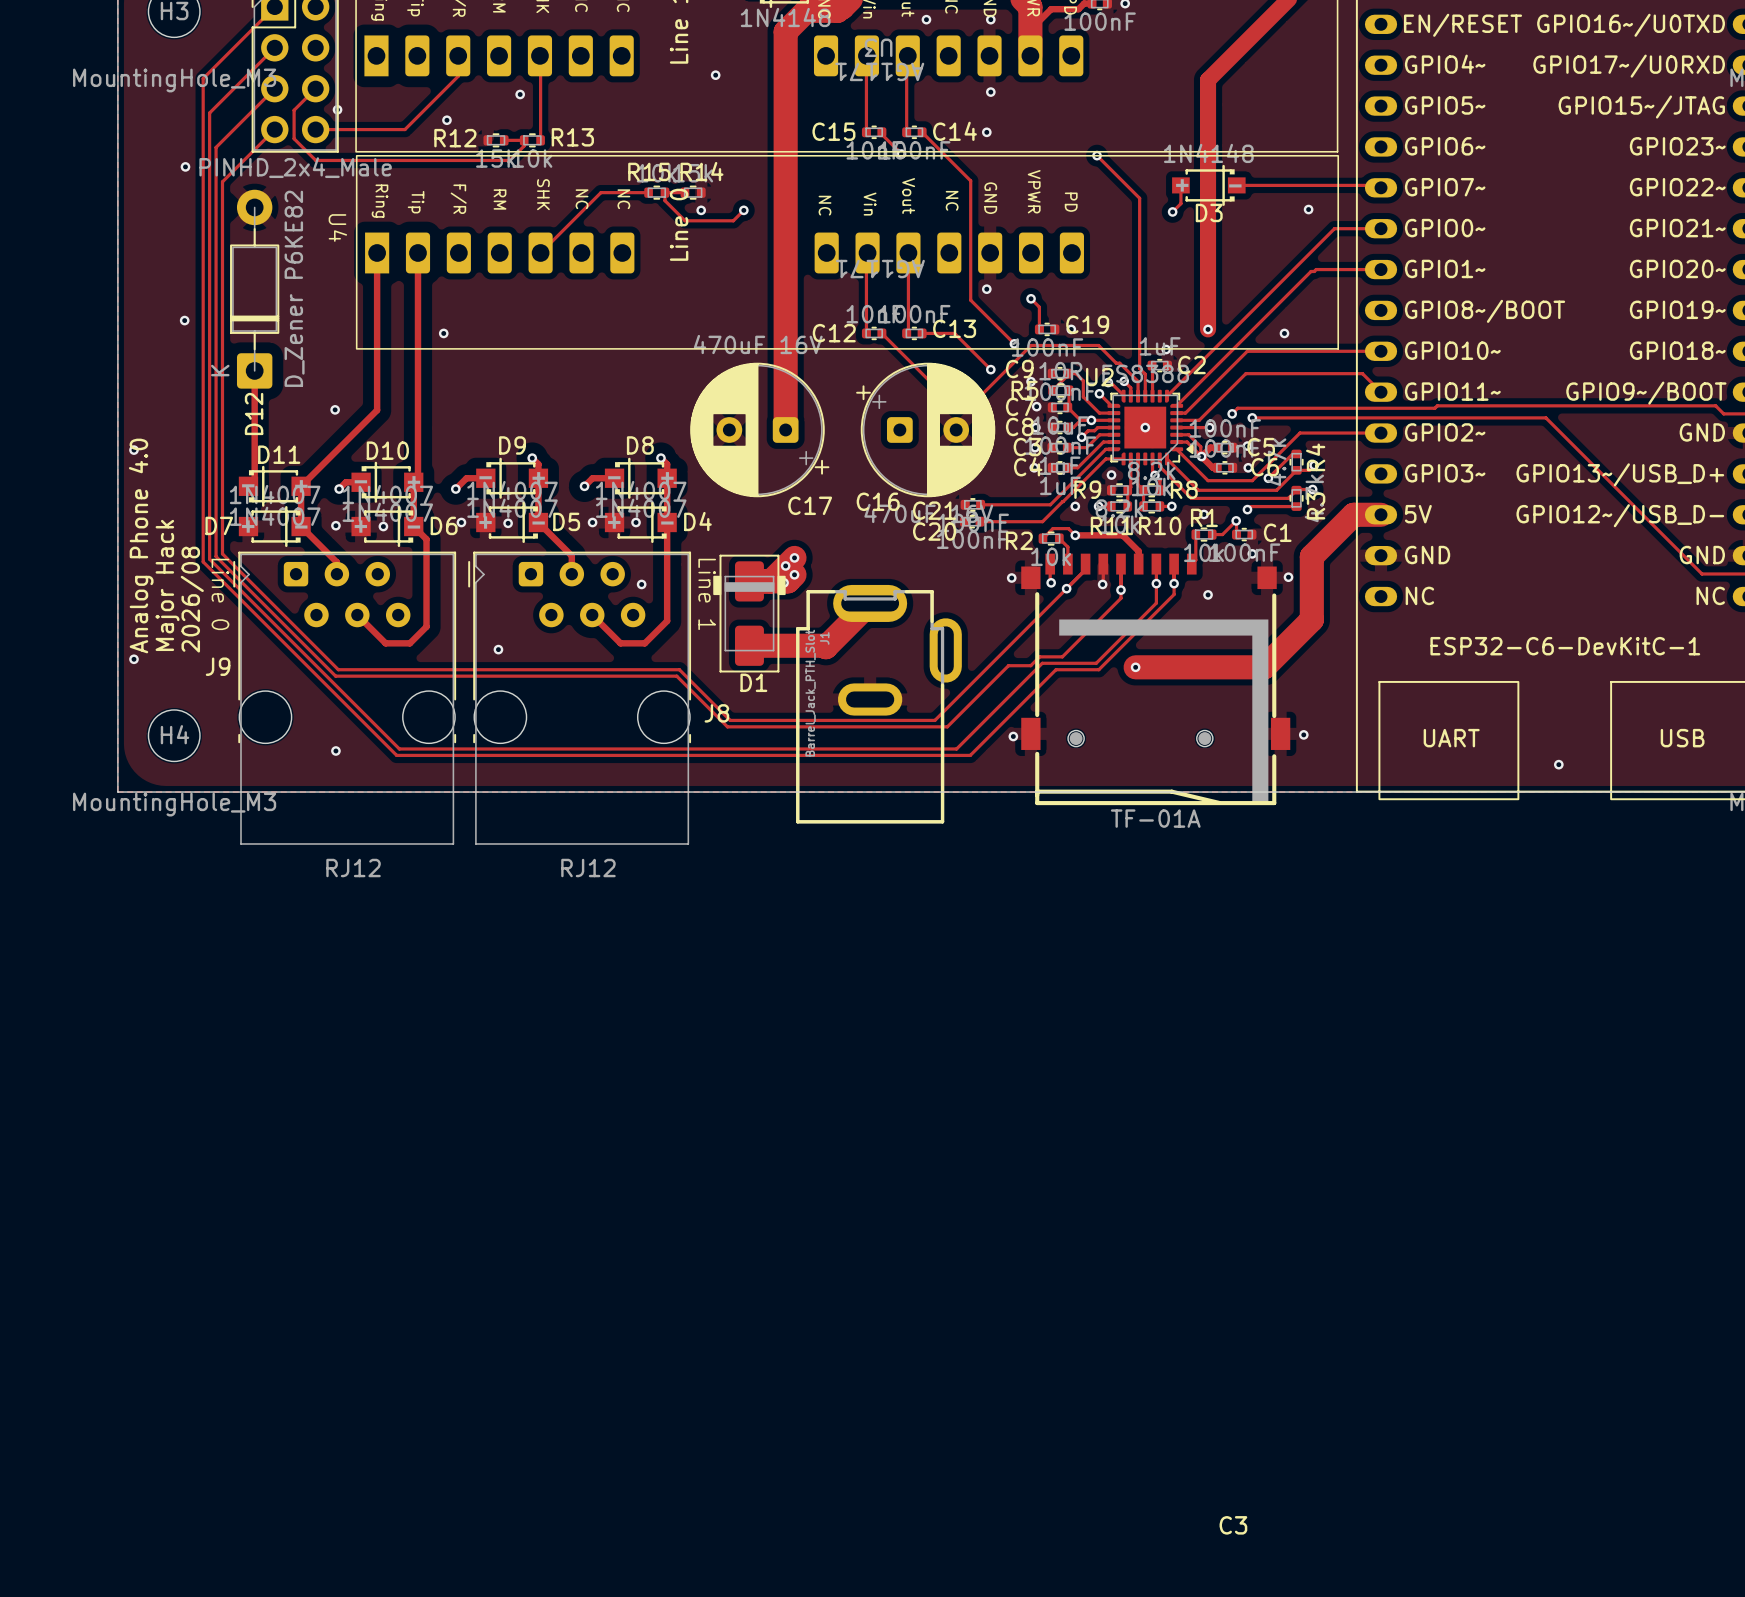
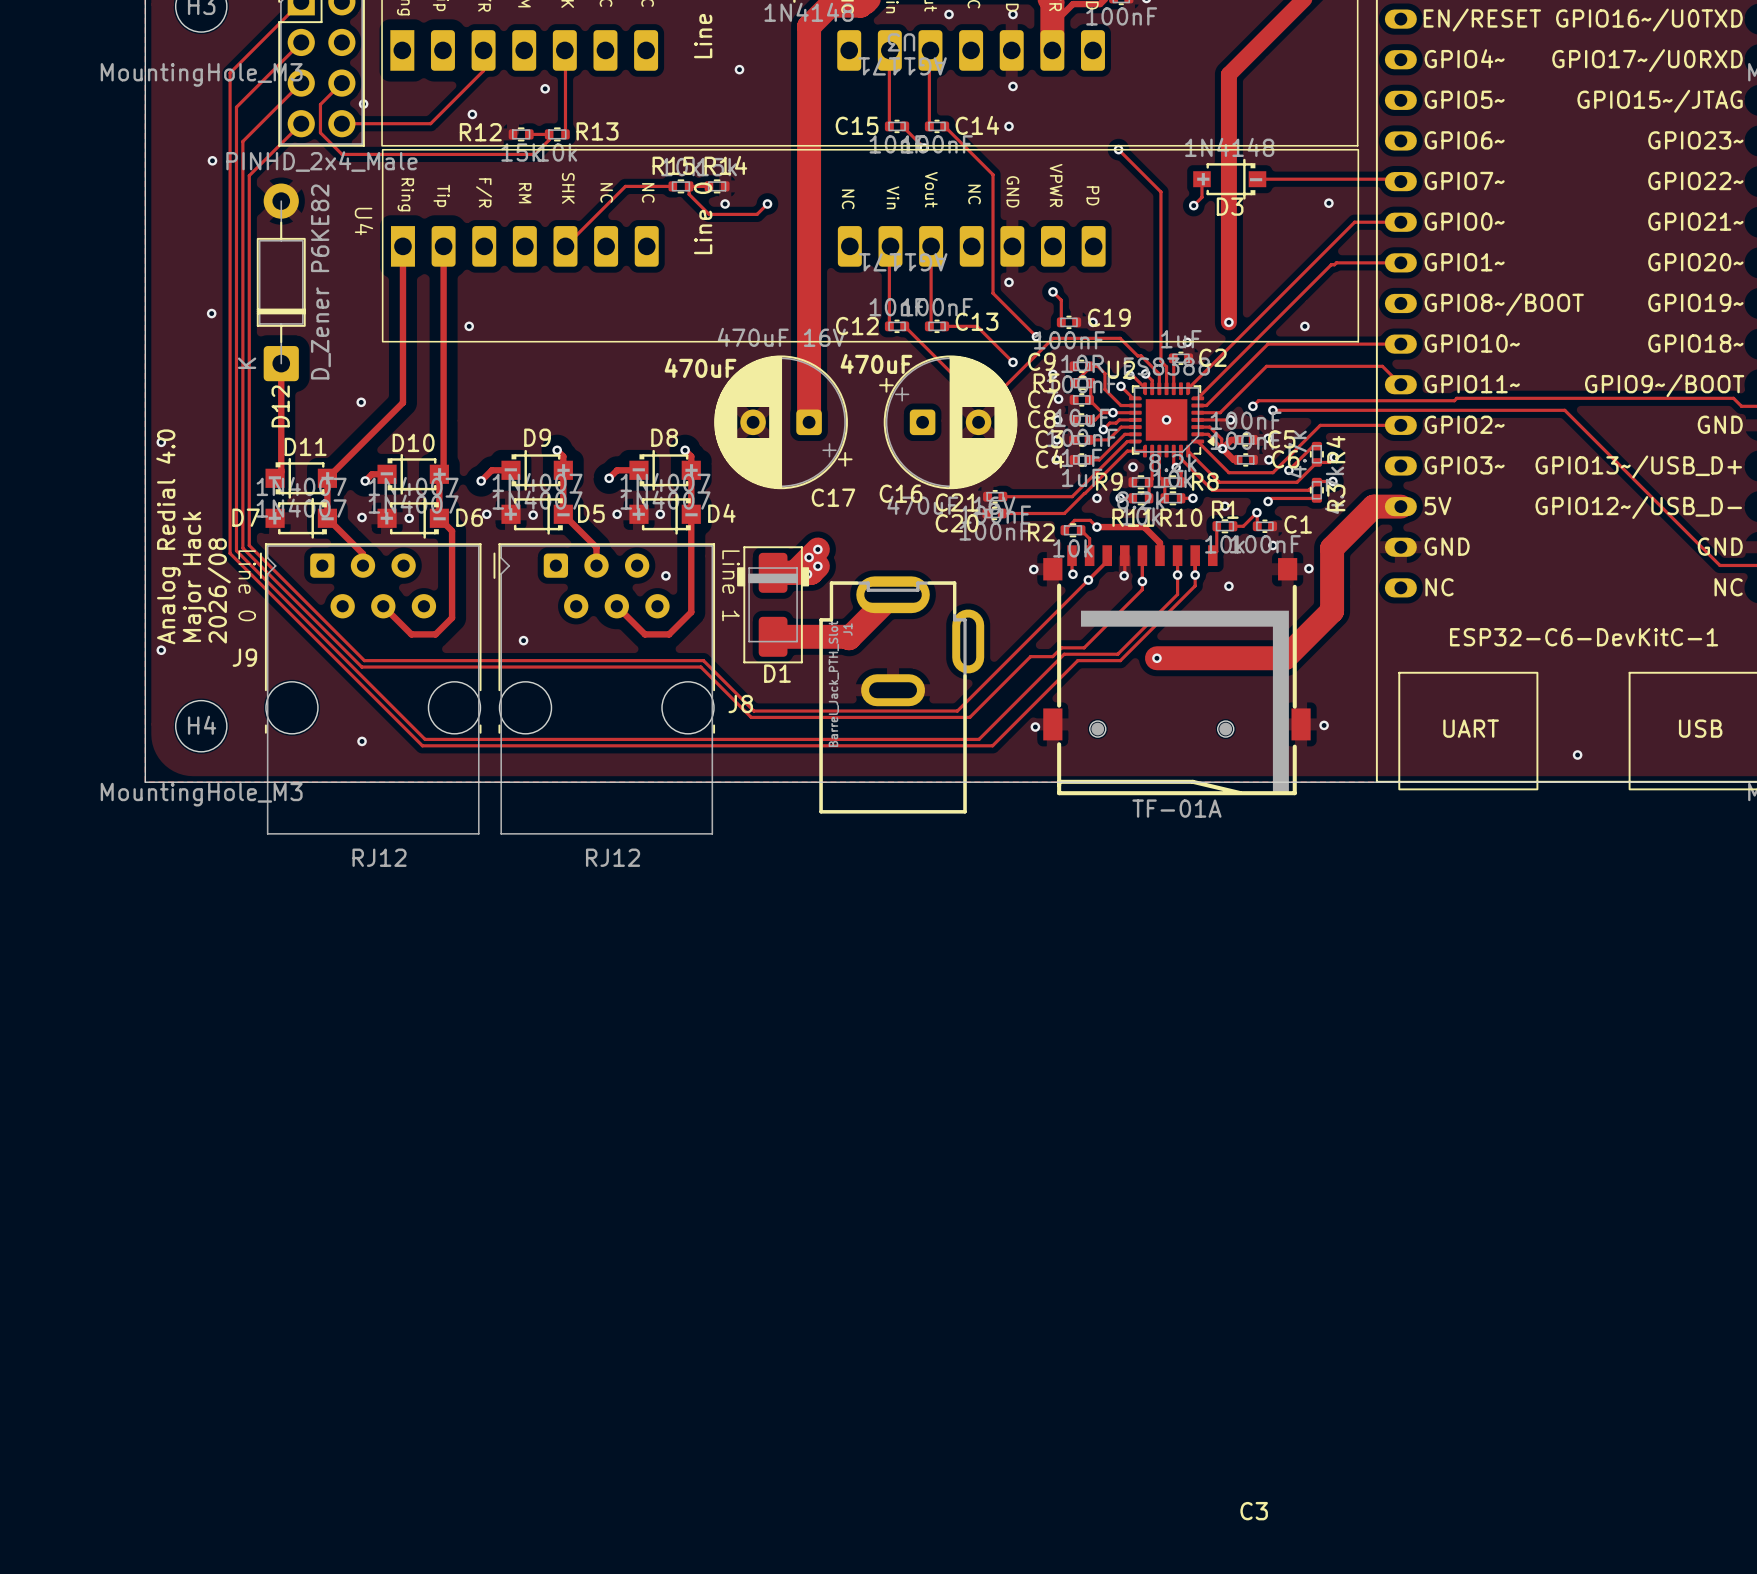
text: none -> 470uF (876, 364)
text: none -> 470uF (700, 368)
text: Analog Phone 4.0 (141, 545) -> Analog Redial 4.0 (168, 536)

